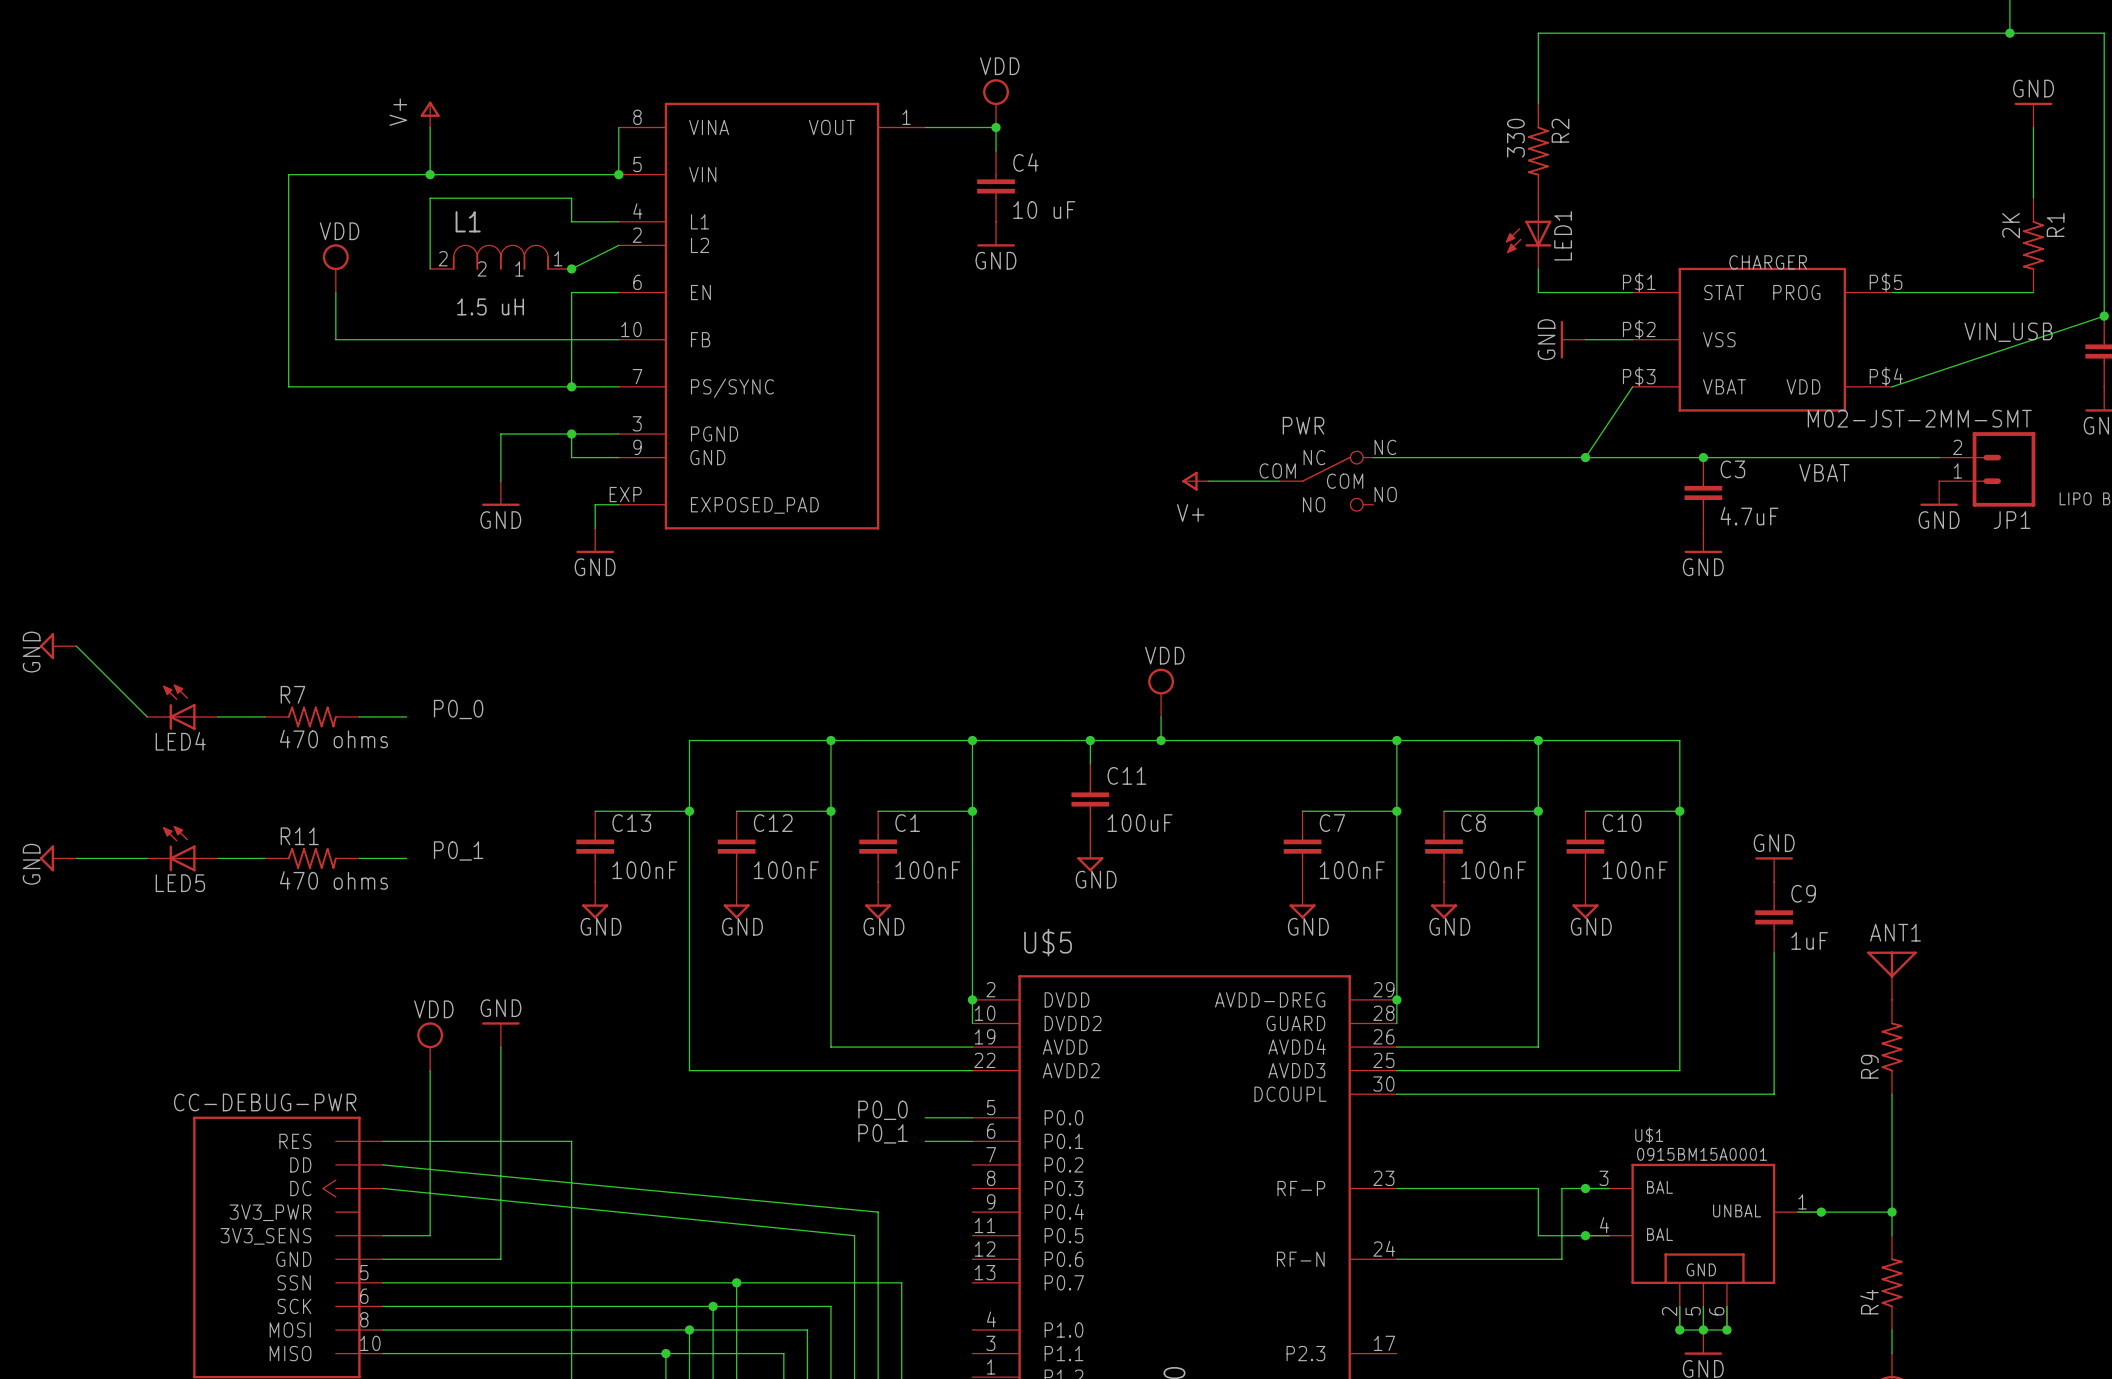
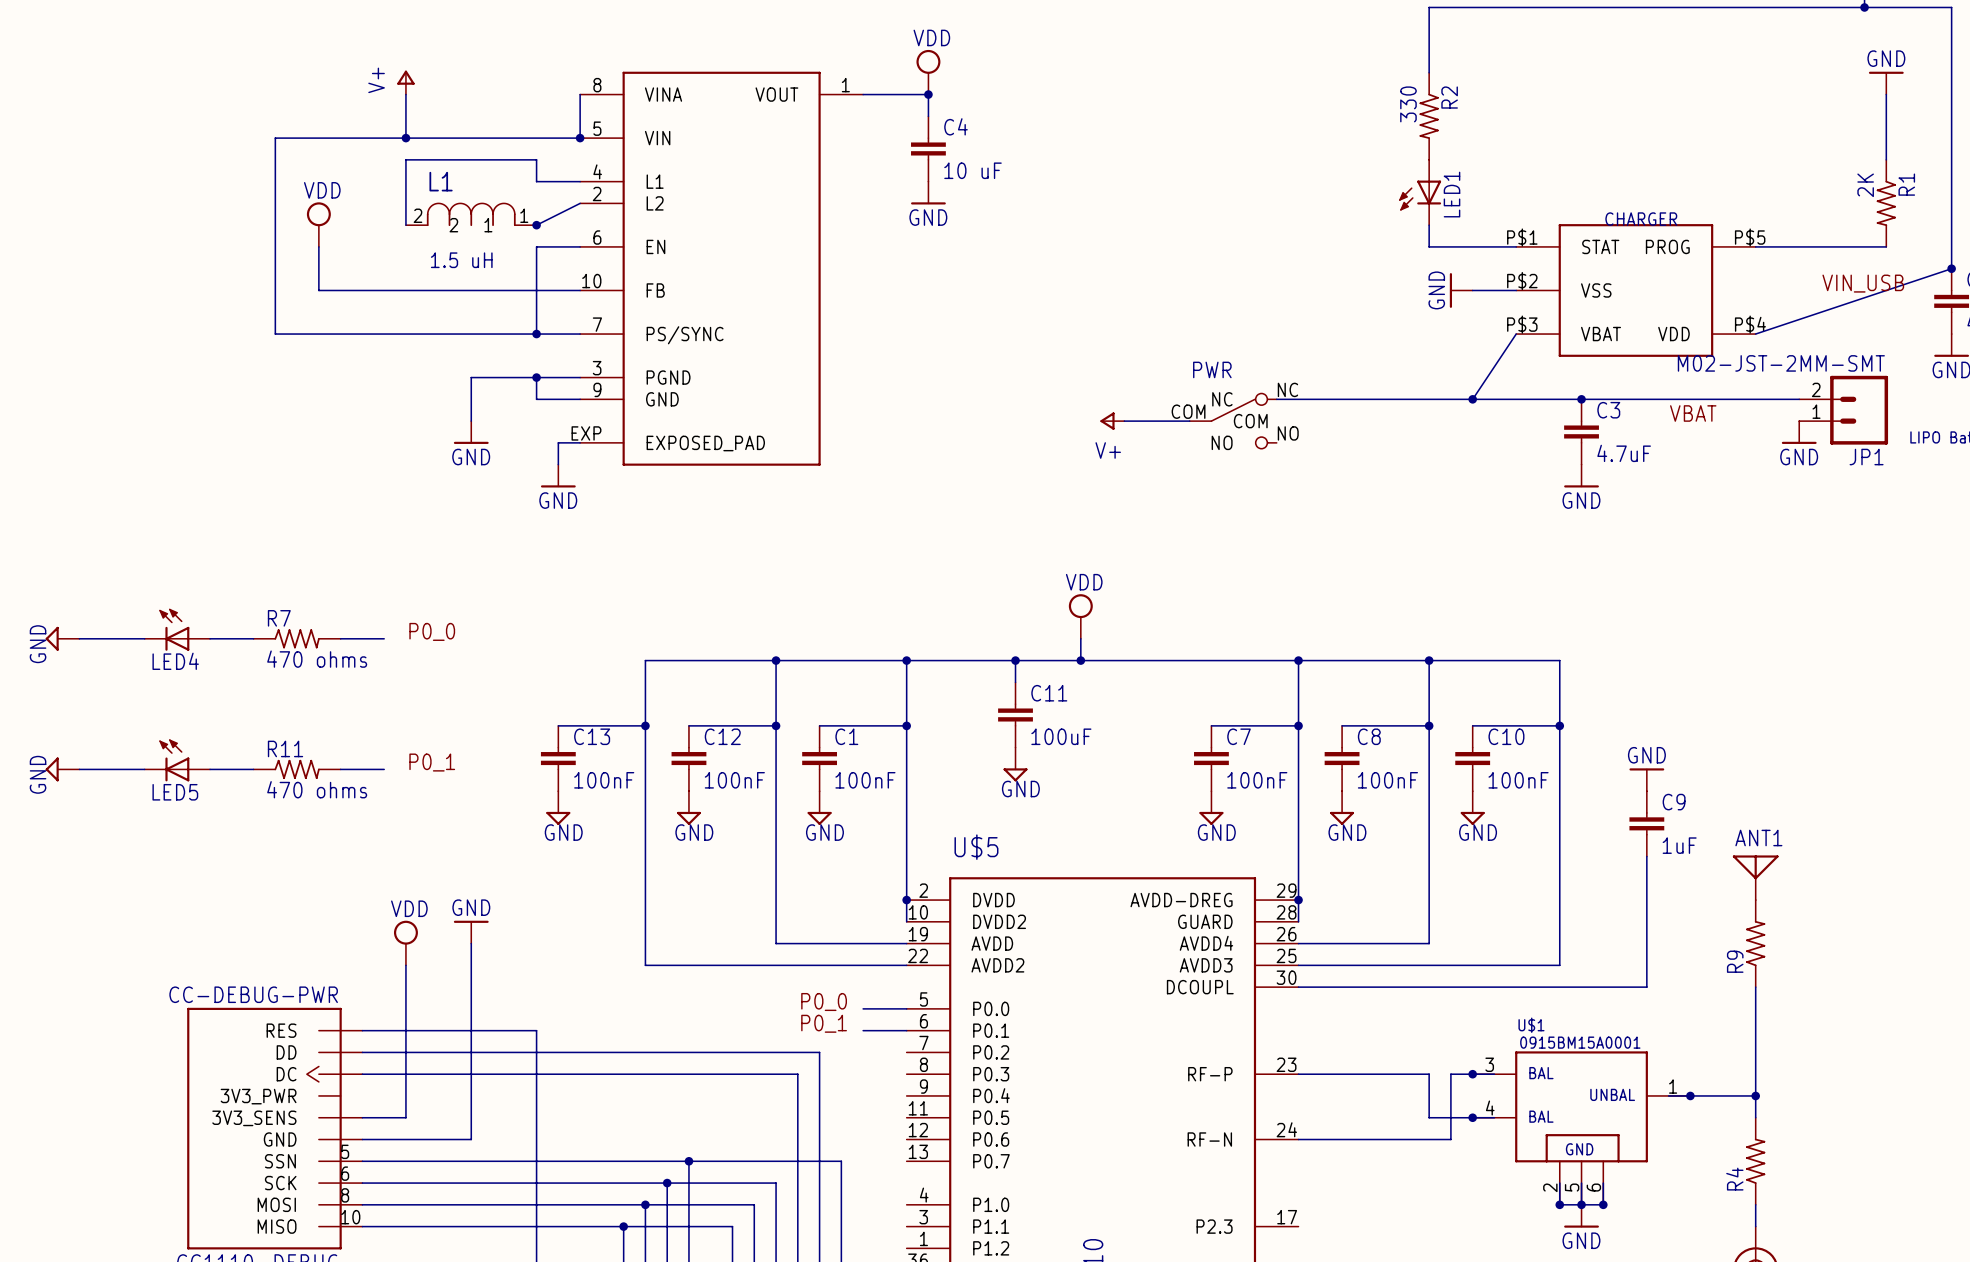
power symbol position: GND (58, 646) -> GND (62, 638)
wire: (76, 646) (147, 716) -> (79, 638) (144, 638)
wire: (382, 1164) (878, 1212) -> (362, 1052) (819, 1052) (819, 1095)
wire: (382, 1188) (854, 1235) -> (362, 1074) (797, 1074) (797, 1117)

